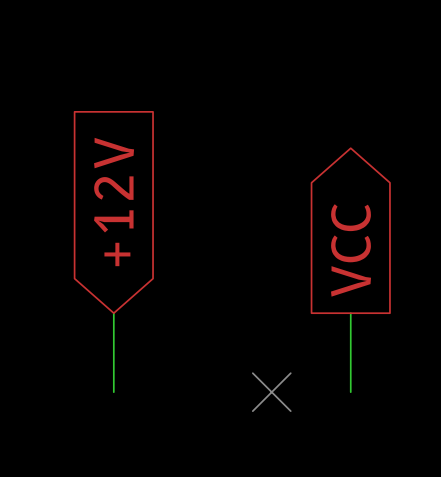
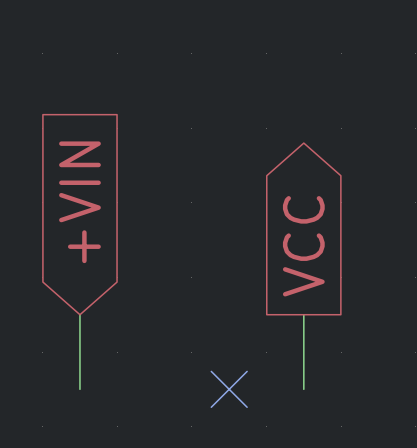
global label: +12V (114, 201) -> +VIN (79, 202)

